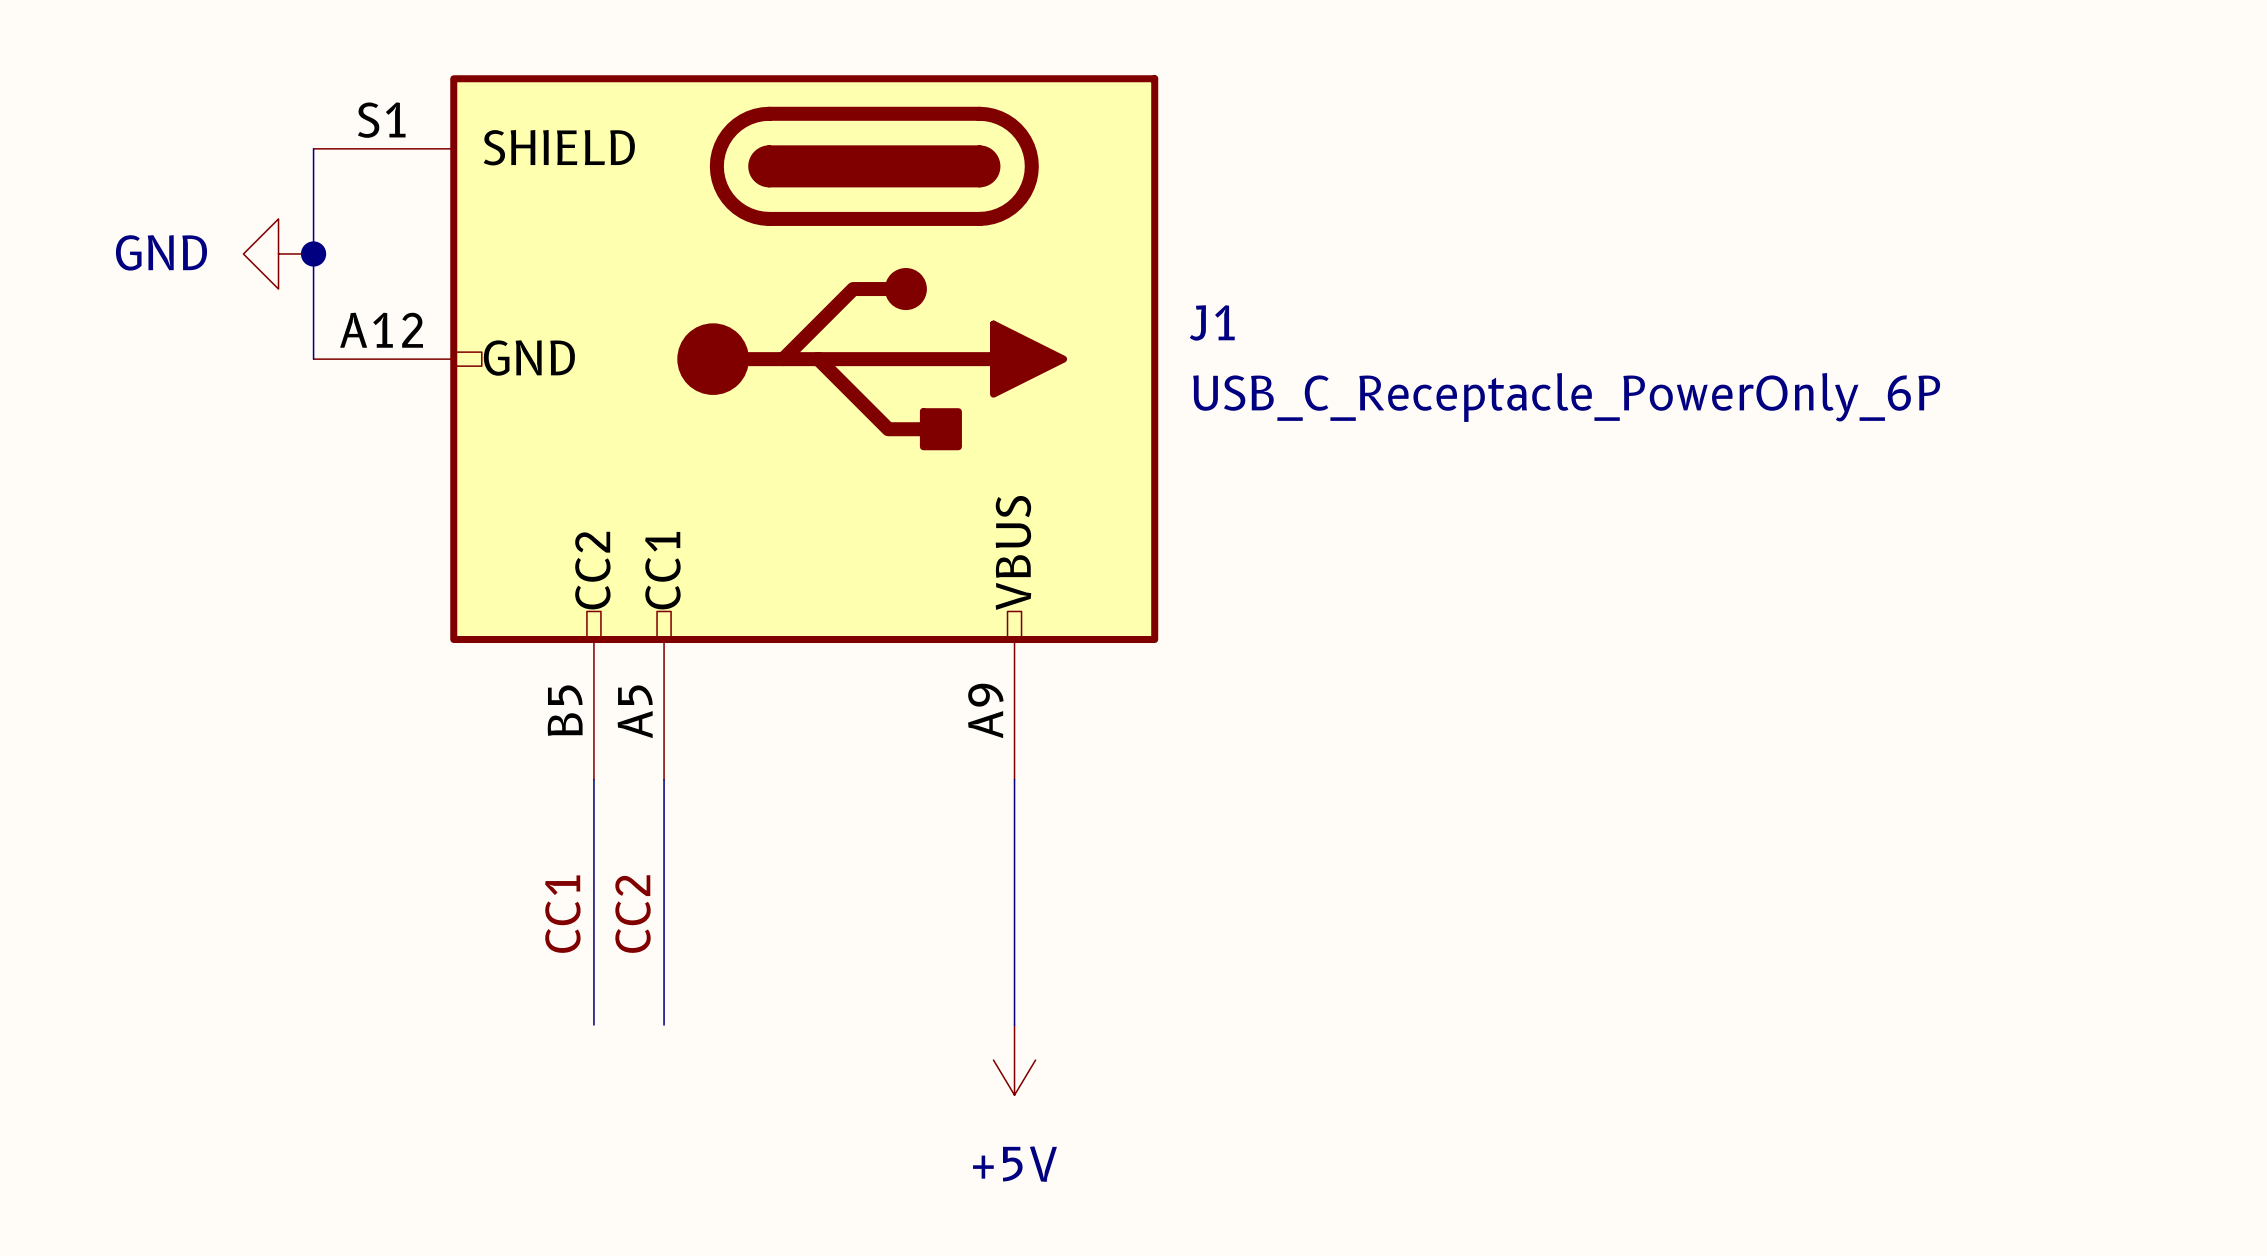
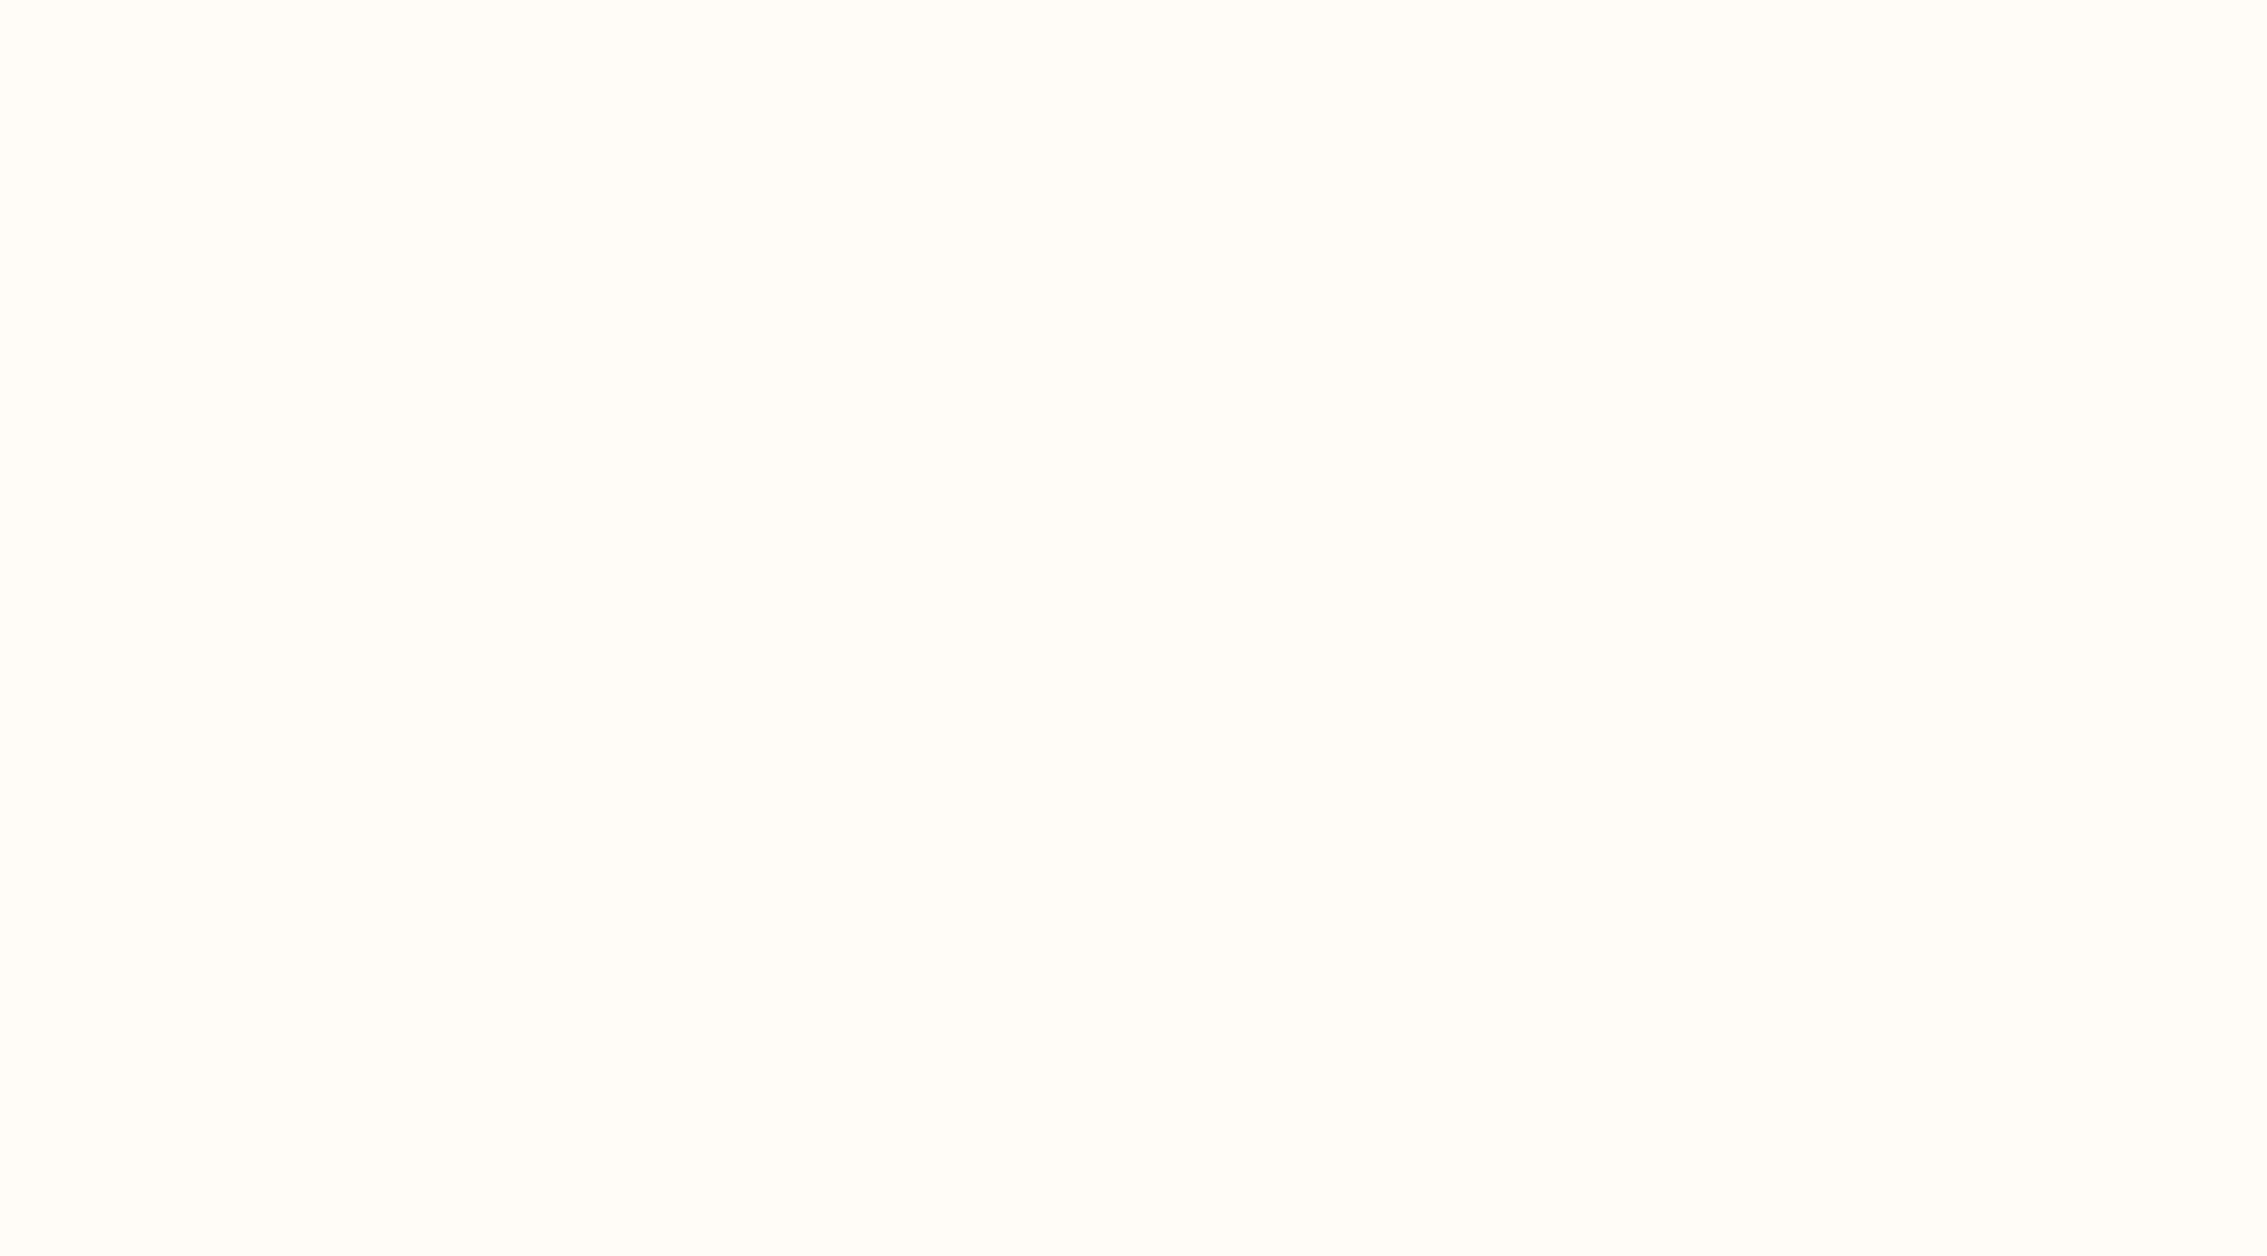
wire: (313, 148) (313, 359) -> none
power symbol: GND (278, 253) -> none
junction: (313, 253) -> none
J1: USB_C_Receptacle_PowerOnly_6P (735, 427) -> none
wire: (593, 779) (593, 1025) -> none
wire: (664, 779) (664, 1025) -> none
wire: (1014, 779) (1014, 1025) -> none
label: CC1 (562, 914) -> none
label: CC2 (633, 914) -> none
power symbol: +5V (1014, 1060) -> none

